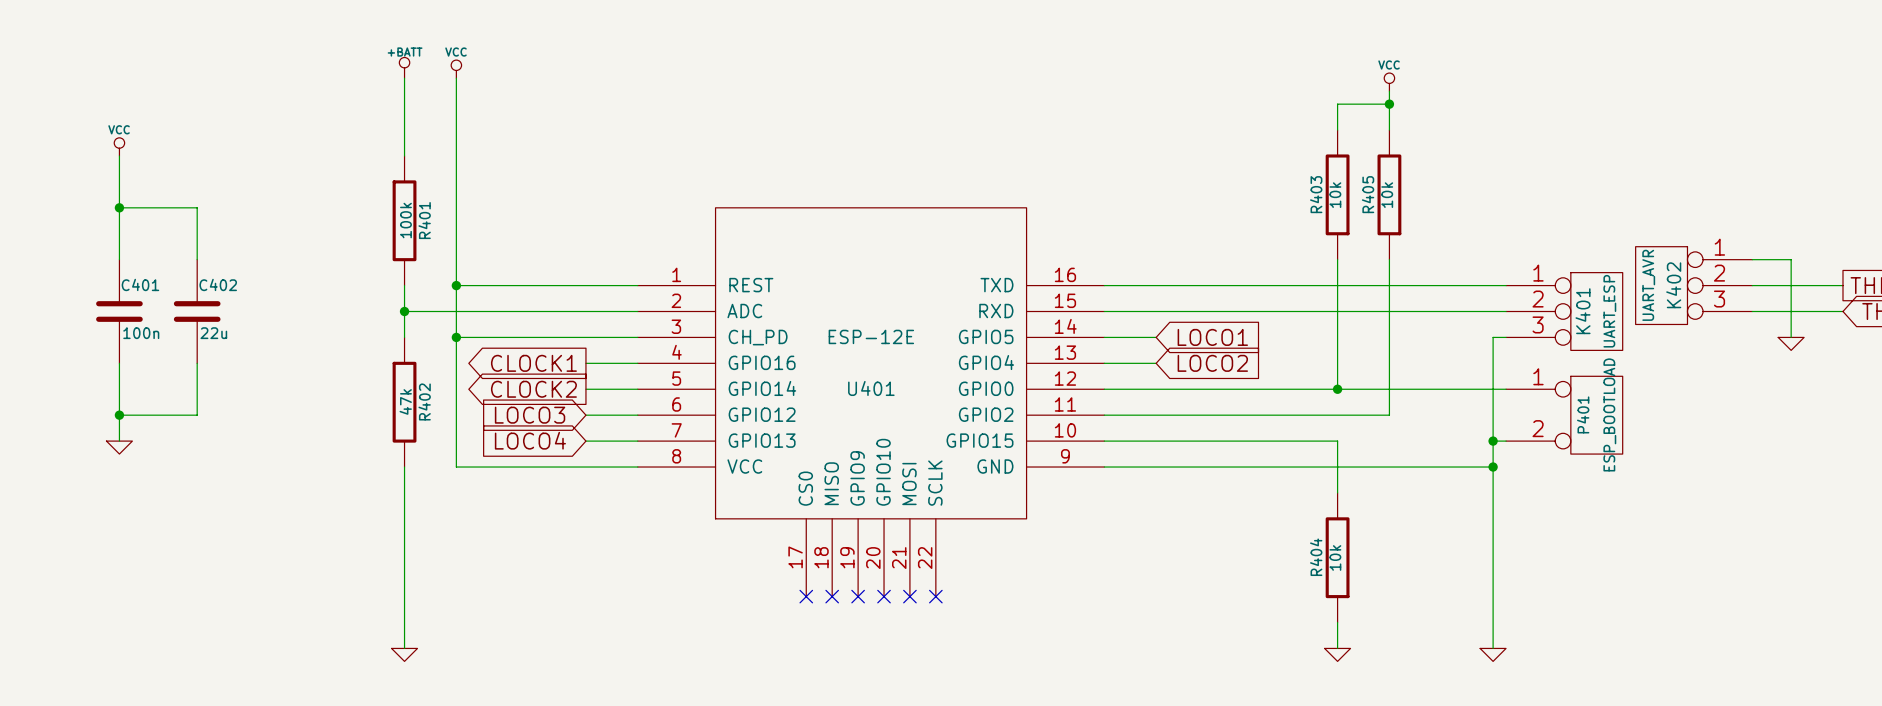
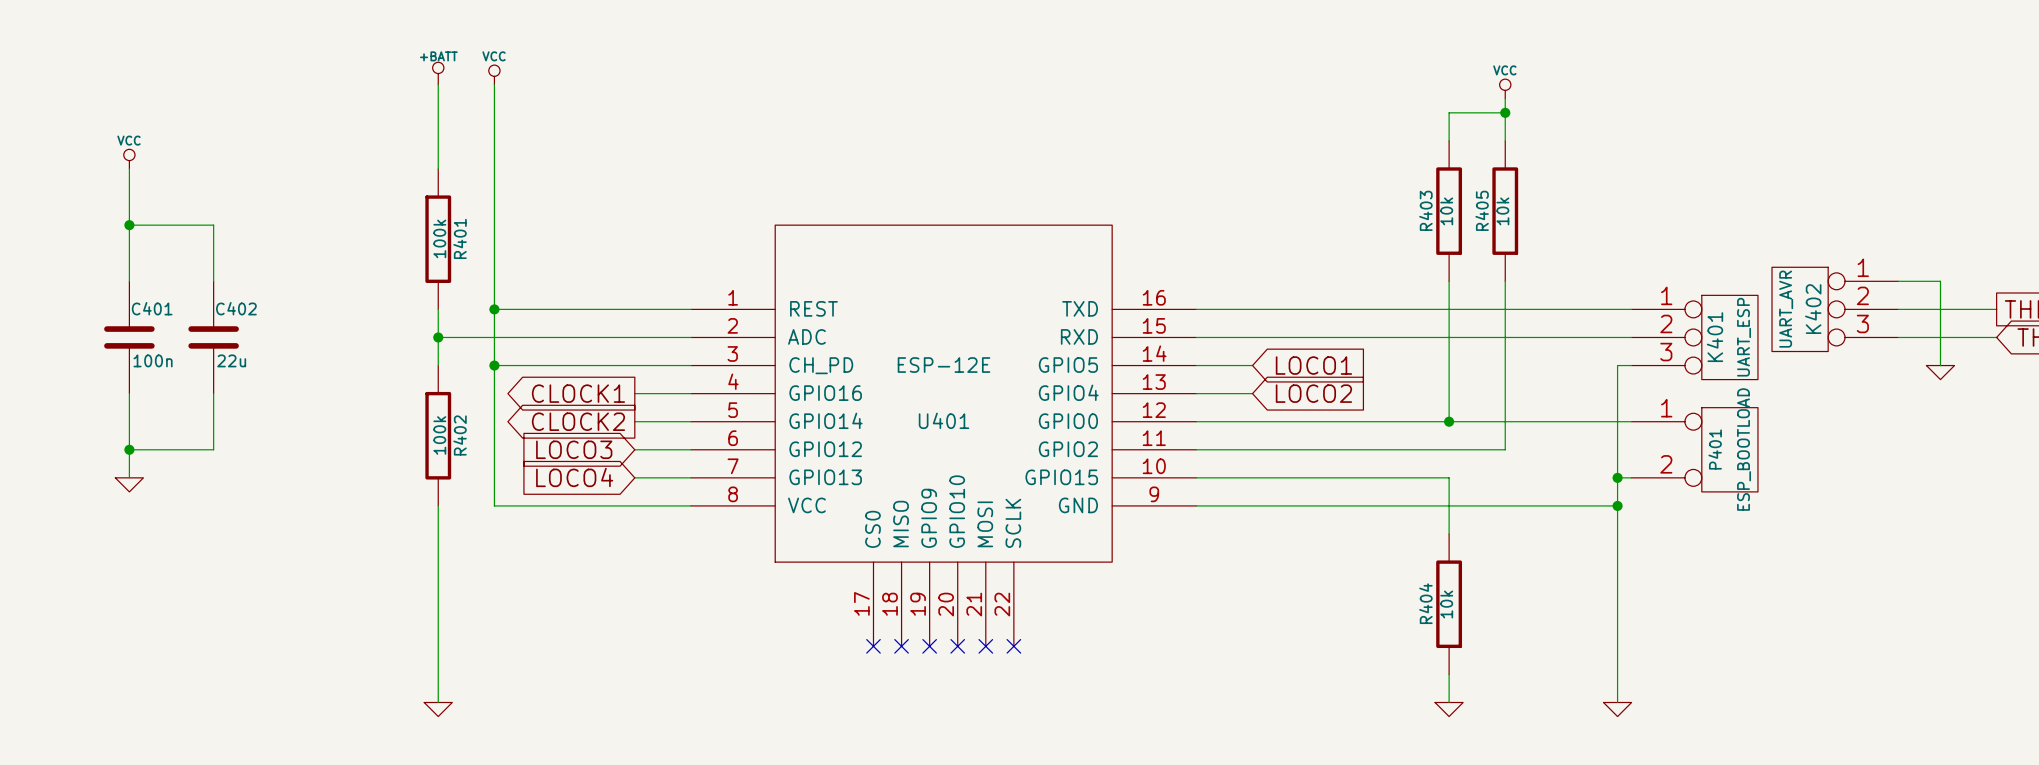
R402 value: 47k (405, 401) -> 100k (439, 435)

